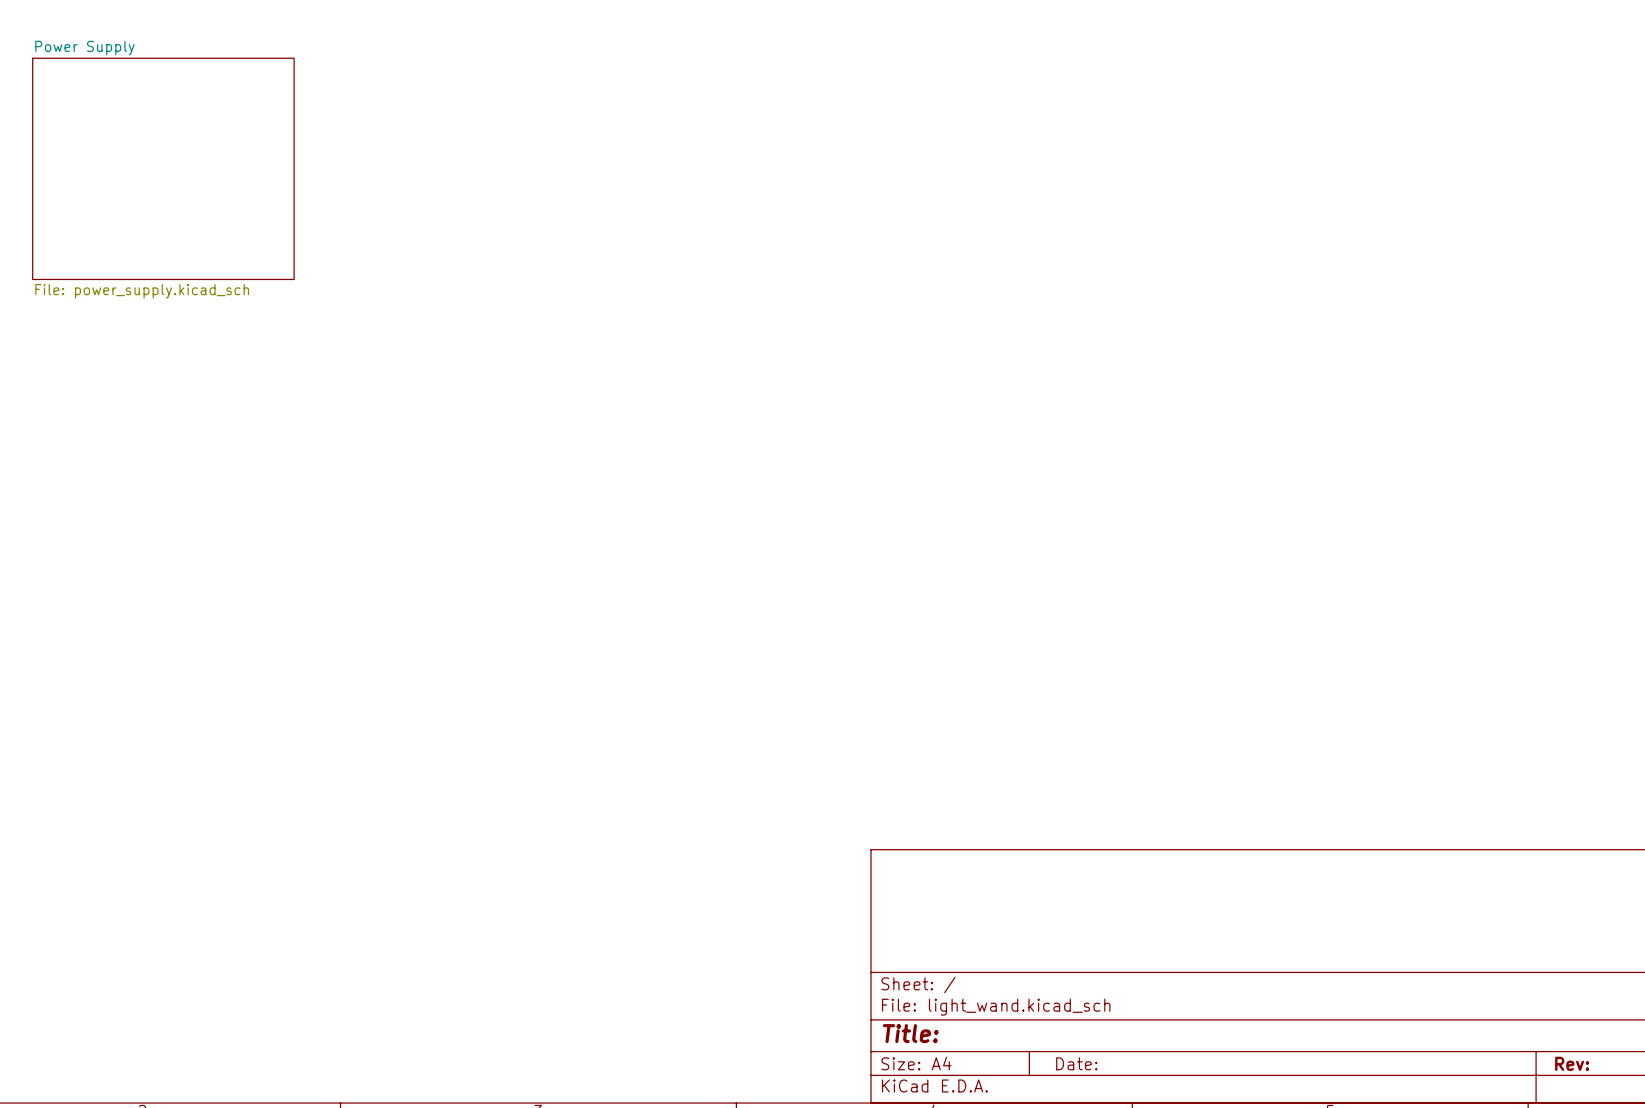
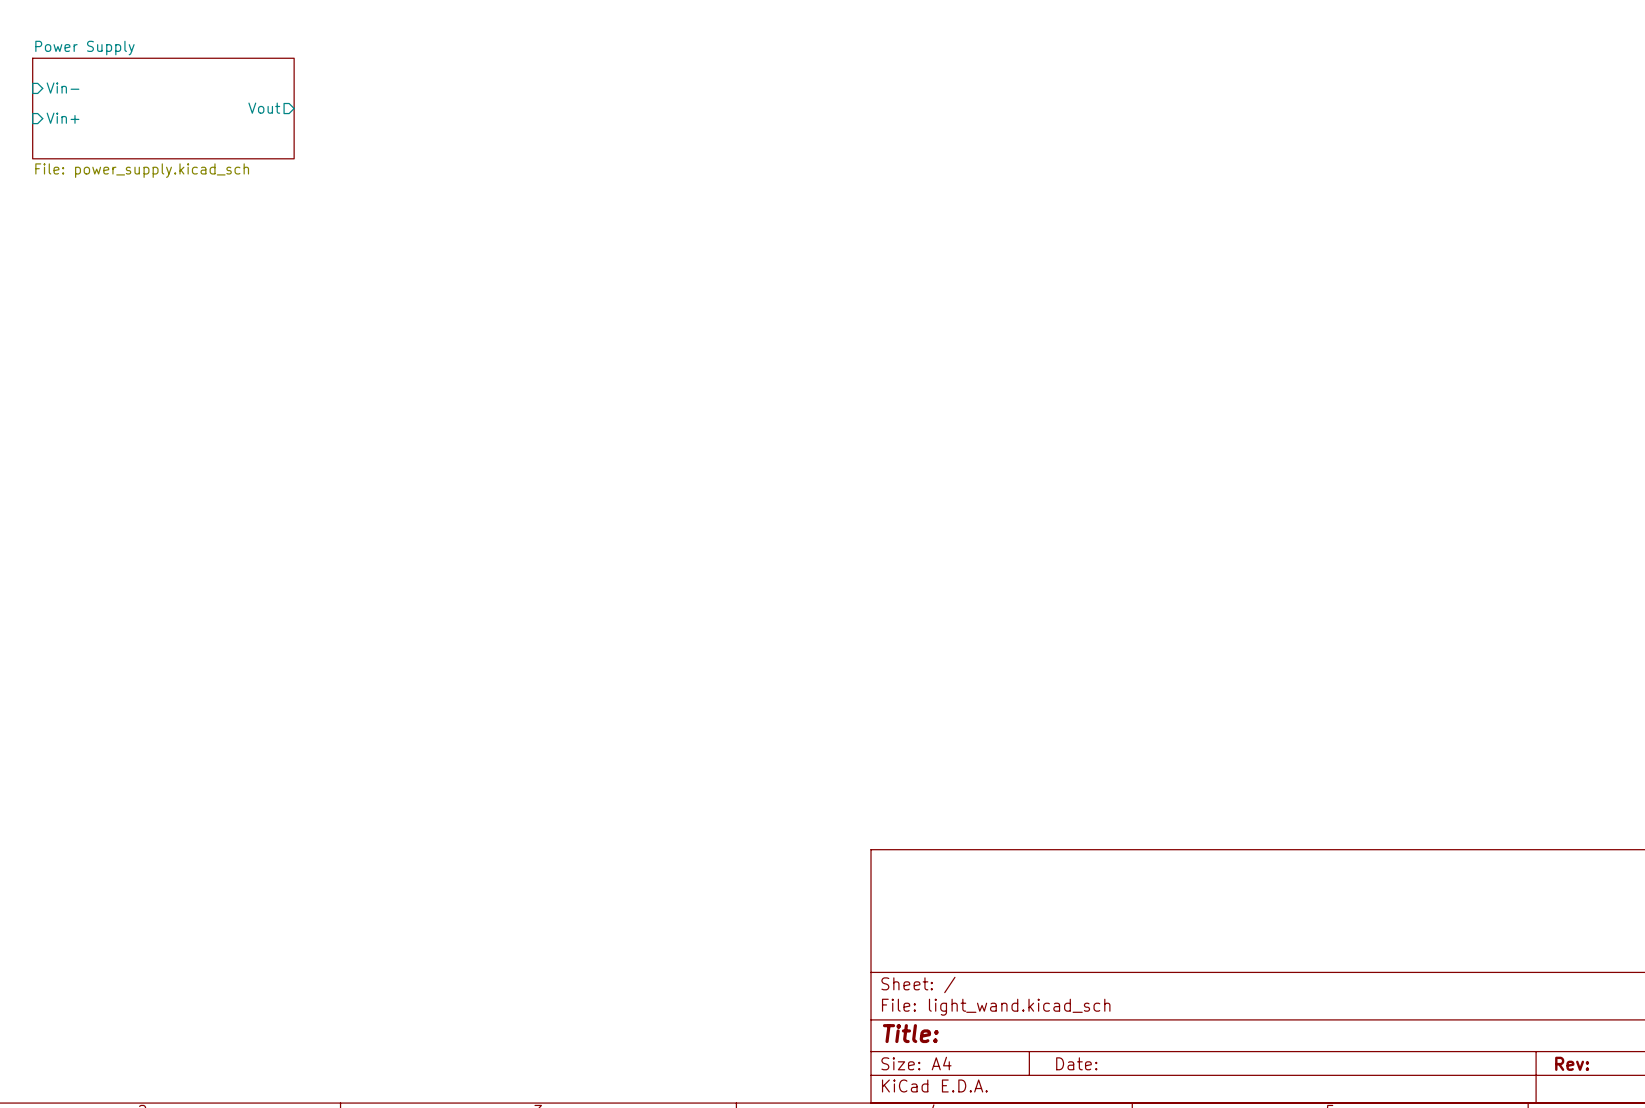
sheet pin: none -> Vin- (63, 88)
sheet Power Supply: none -> File: power_supply.kicad_sch (163, 108)
sheet pin: none -> Vout (264, 108)
sheet pin: none -> Vin+ (63, 118)
sheet Power Supply: File: power_supply.kicad_sch (163, 168) -> none

